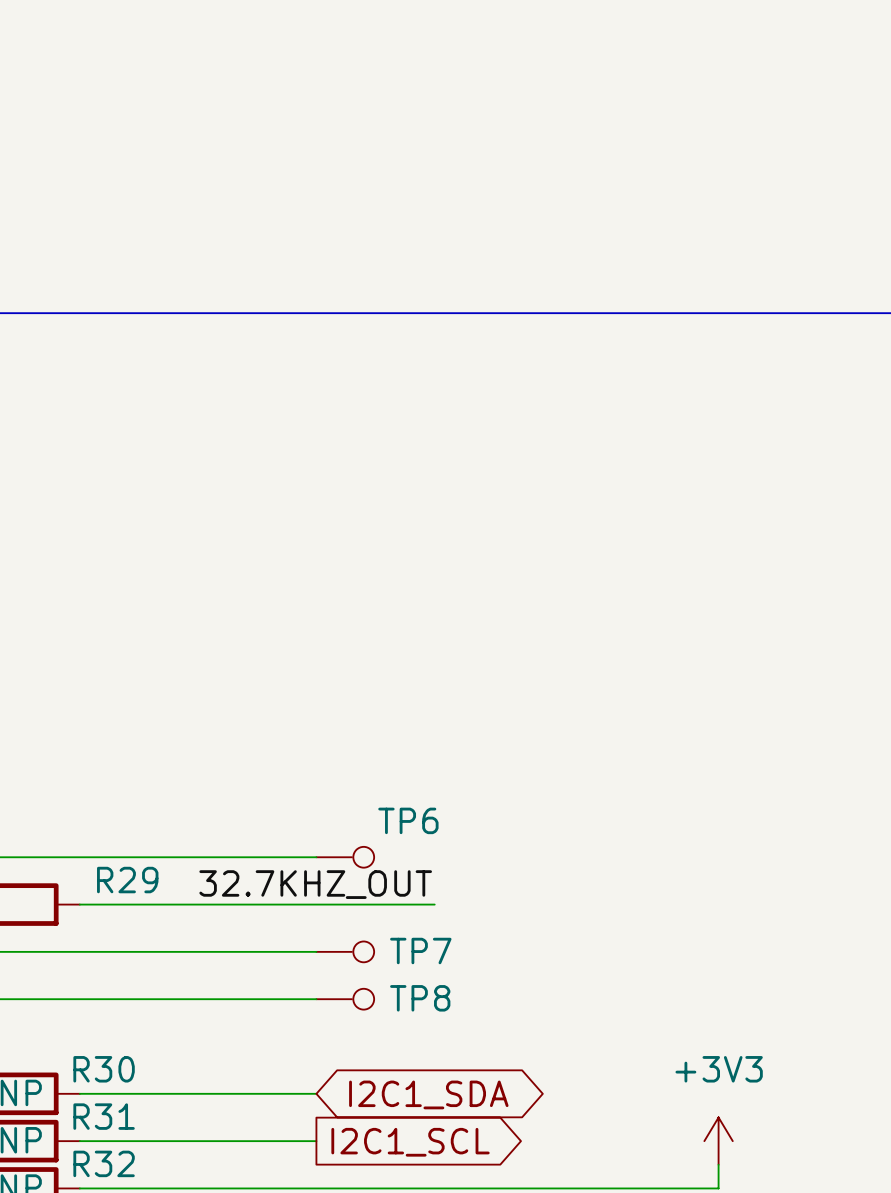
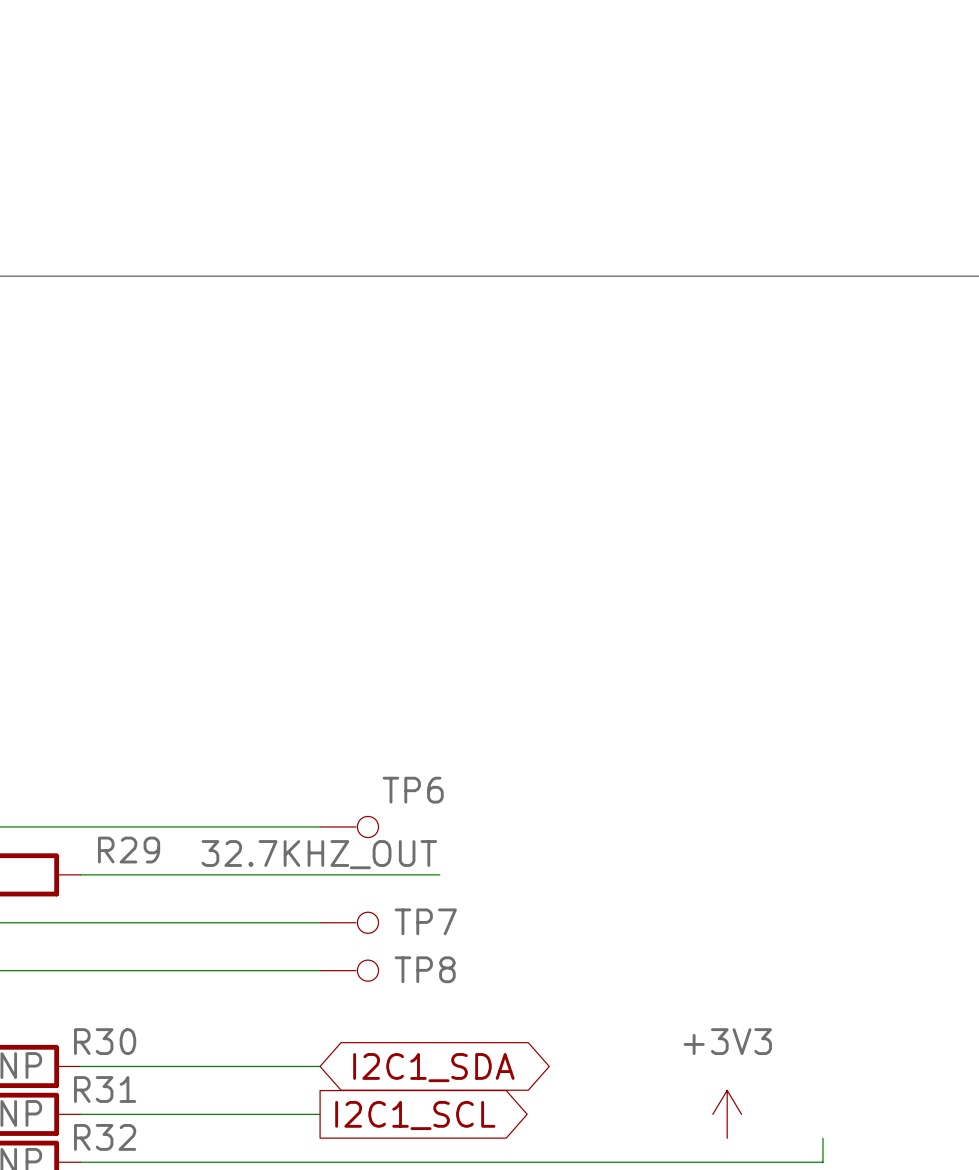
wire: (718, 1164) (718, 1188) -> (822, 1138) (822, 1162) (727, 1162)

